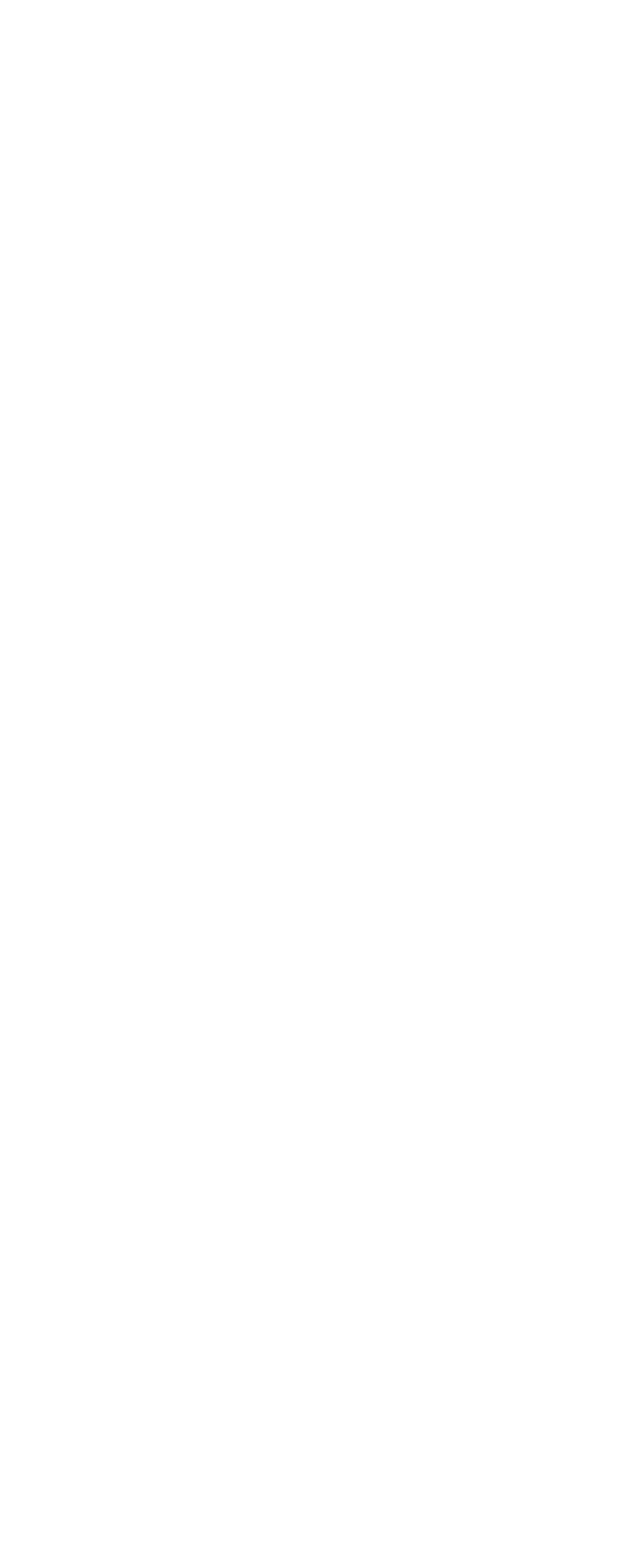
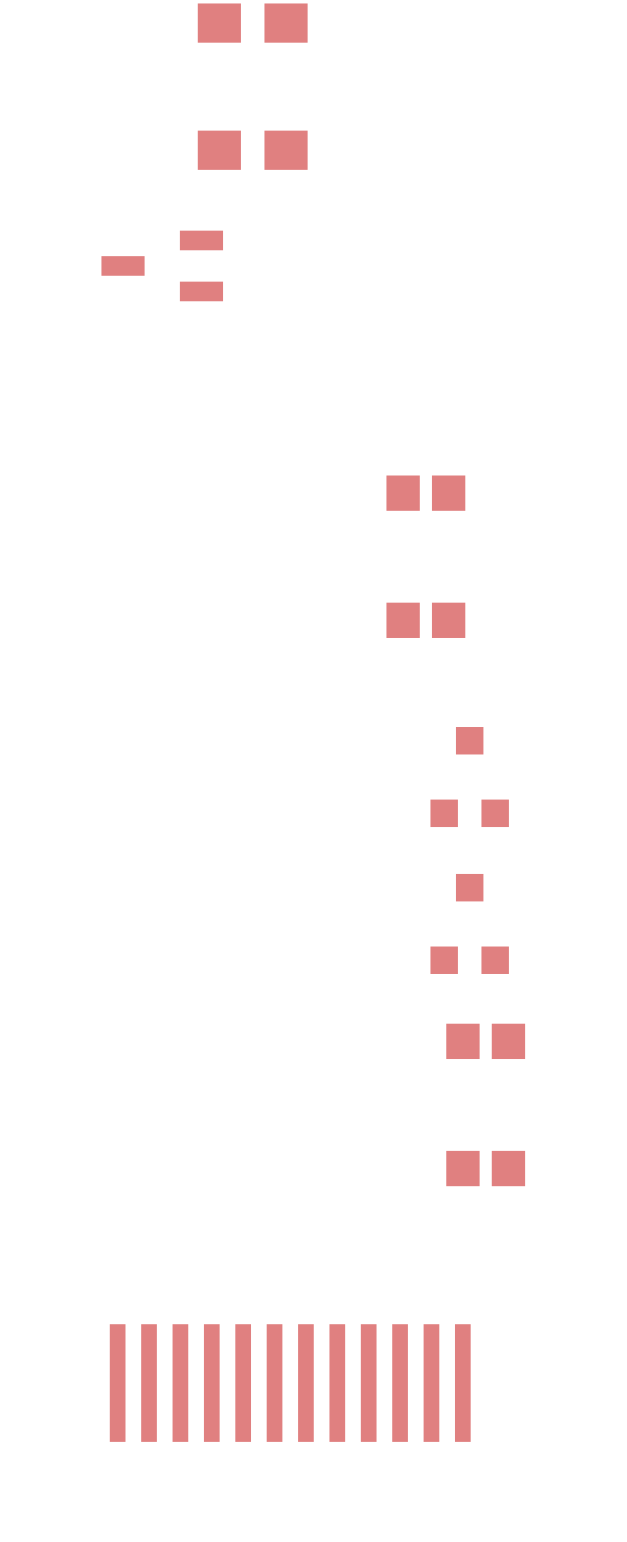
part: none -> (252, 23)
part: none -> (252, 150)
part: none -> (162, 265)
part: none -> (425, 493)
part: none -> (425, 620)
part: none -> (469, 777)
part: none -> (469, 923)
part: none -> (485, 1041)
part: none -> (485, 1168)
part: none -> (290, 1383)

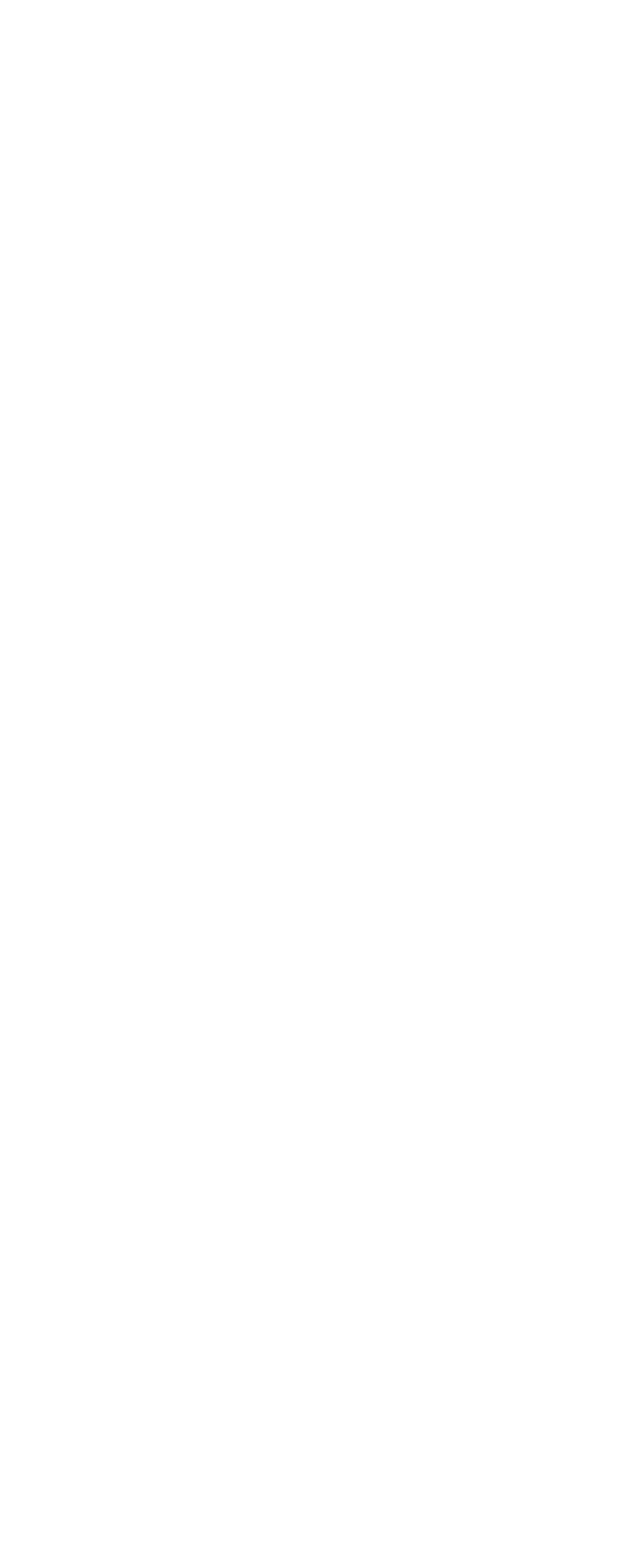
part: (252, 23) -> none
part: (252, 150) -> none
part: (162, 265) -> none
part: (425, 493) -> none
part: (425, 620) -> none
part: (469, 777) -> none
part: (469, 923) -> none
part: (485, 1041) -> none
part: (485, 1168) -> none
part: (290, 1383) -> none

